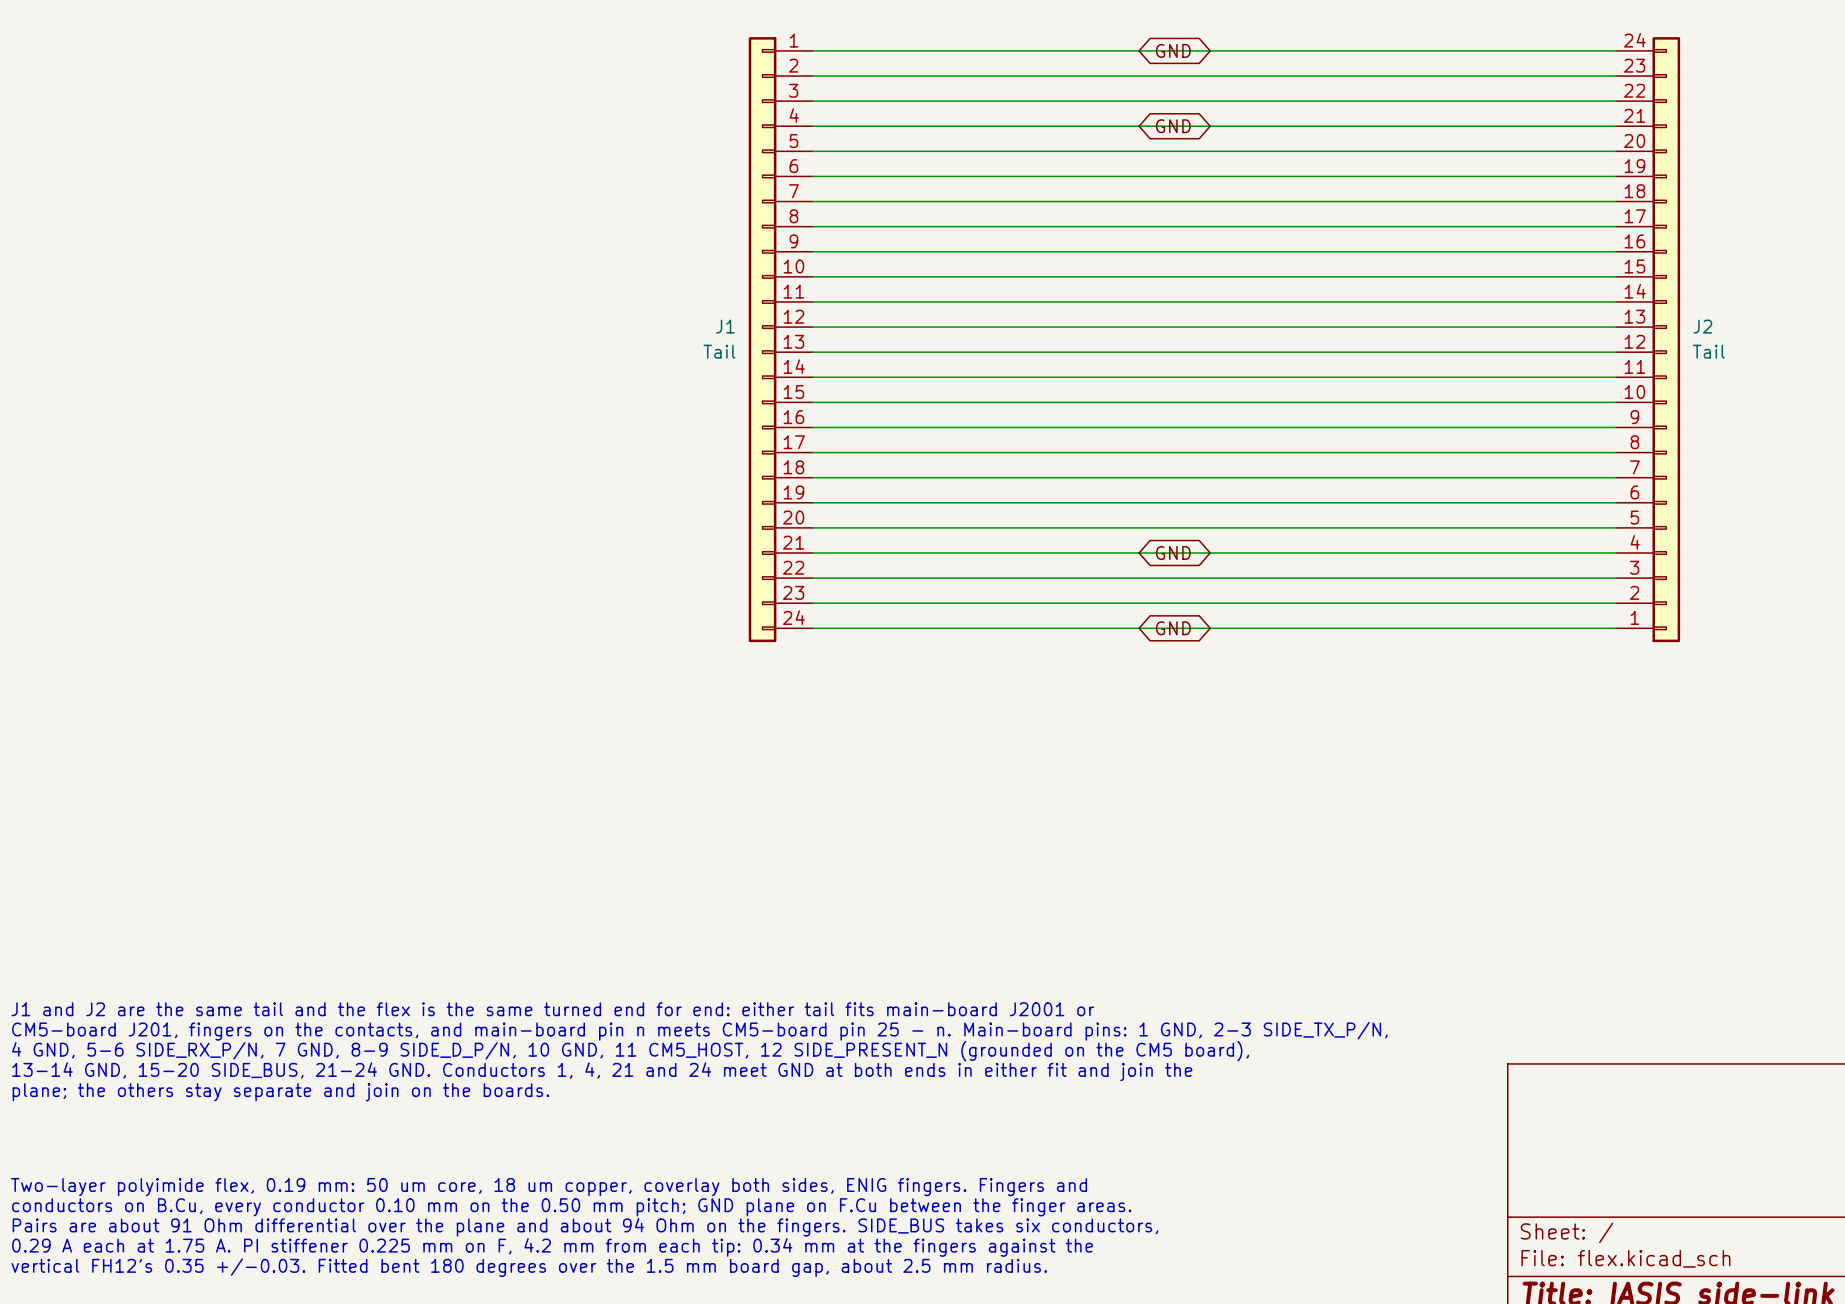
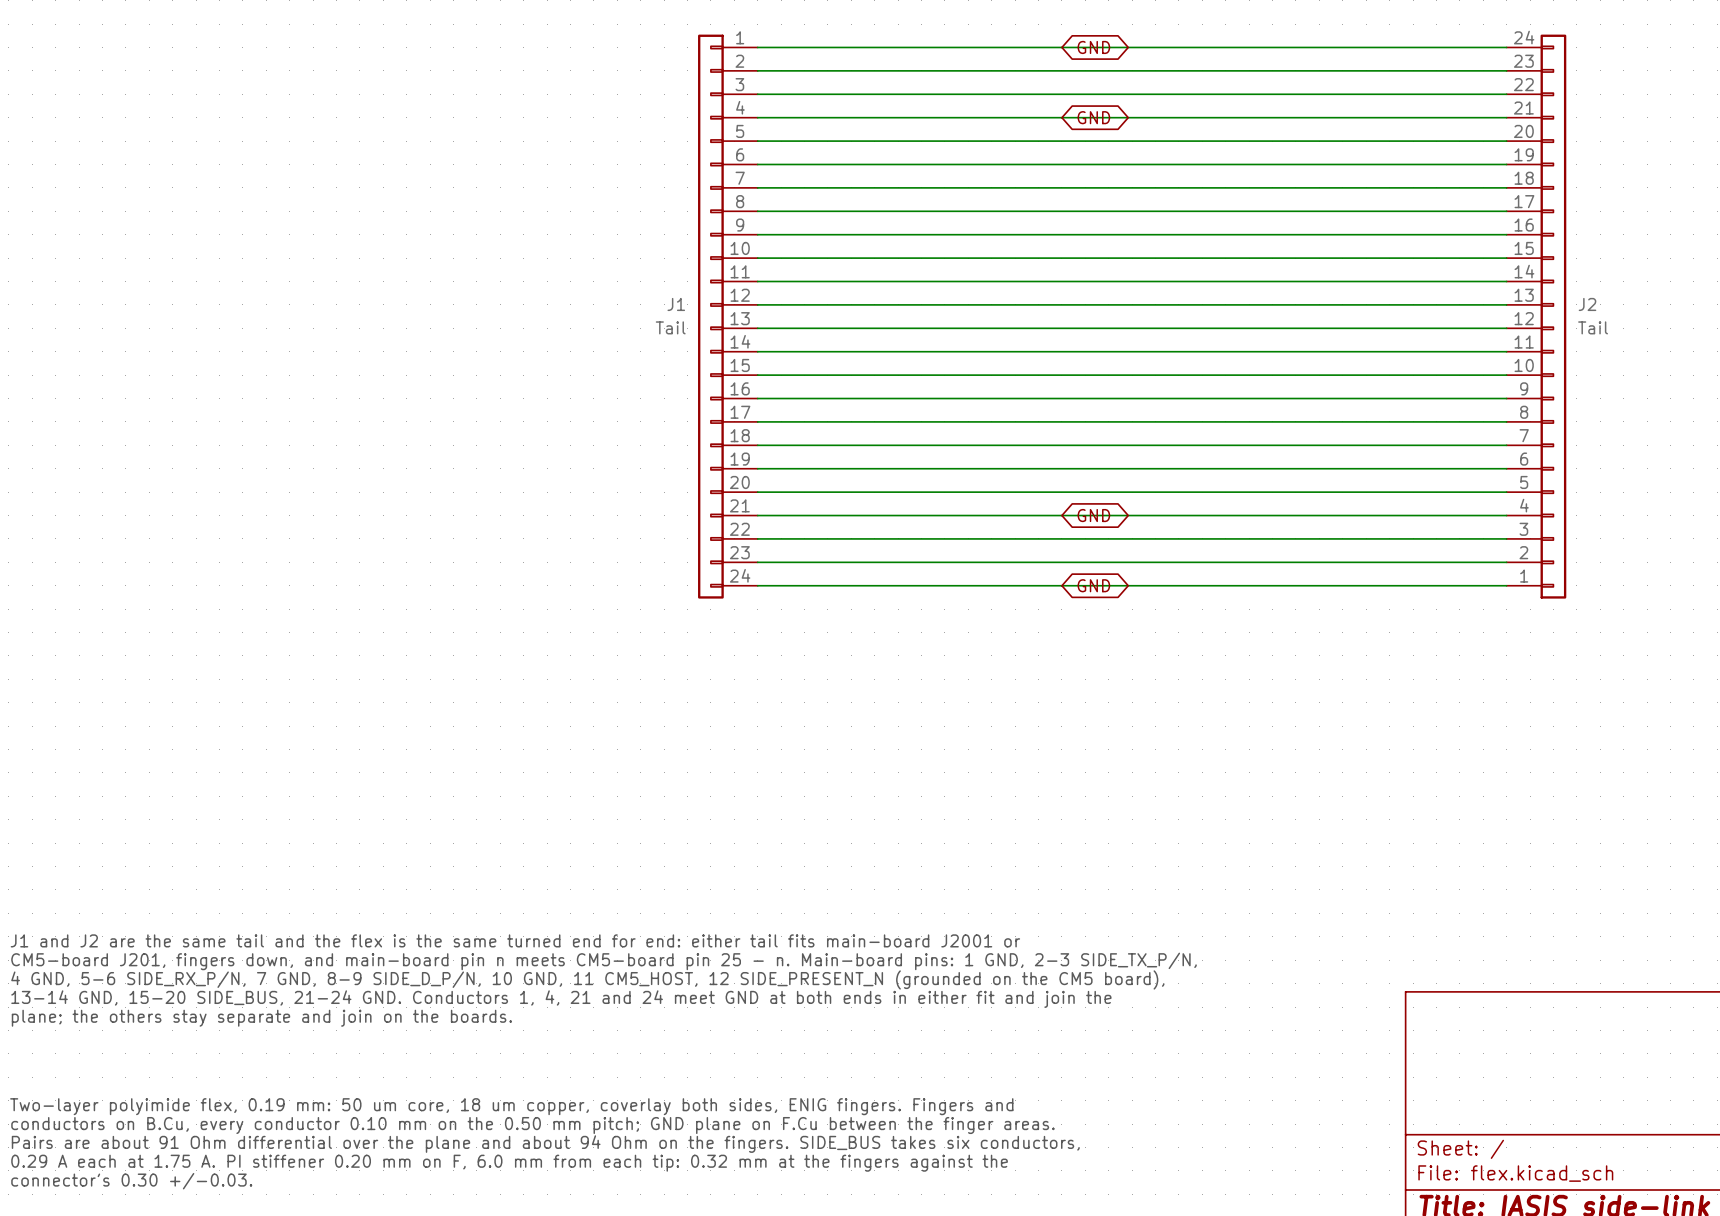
text: CM5-board J201, fingers on the contacts, and main-board pin n meets CM5-board pin 25 - n. Main-board pins: 1 GND, 2-3 SIDE_TX_P/N, (699, 1031) -> CM5-board J201, fingers down, and main-board pin n meets CM5-board pin 25 - n. Main-board pins: 1 GND, 2-3 SIDE_TX_P/N, (604, 961)
text: 0.29 A each at 1.75 A. PI stiffener 0.225 mm on F, 4.2 mm from each tip: 0.34 mm at the fingers against the (552, 1247) -> 0.29 A each at 1.75 A. PI stiffener 0.20 mm on F, 6.0 mm from each tip: 0.32 mm at the fingers against the (509, 1163)
text: vertical FH12's 0.35 +/-0.03. Fitted bent 180 degrees over the 1.5 mm board gap, about 2.5 mm radius. (529, 1267) -> connector's 0.30 +/-0.03. (131, 1181)

